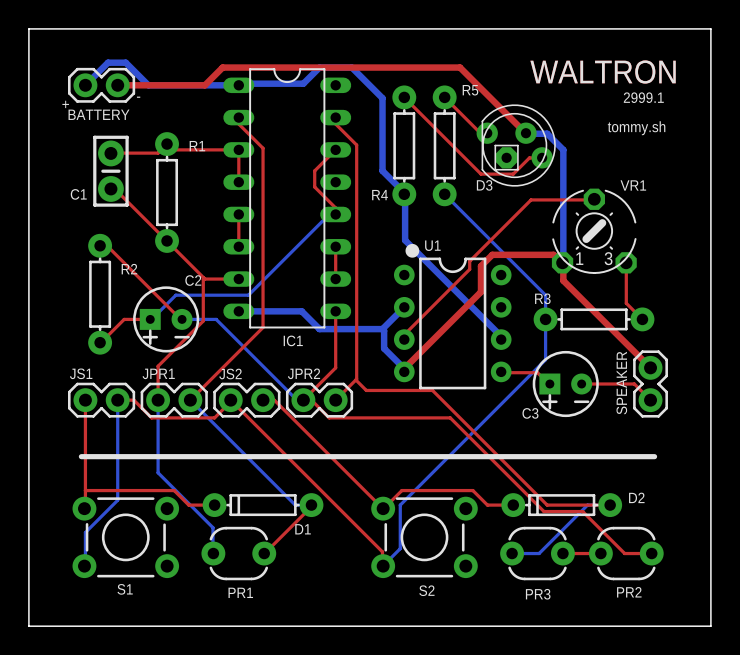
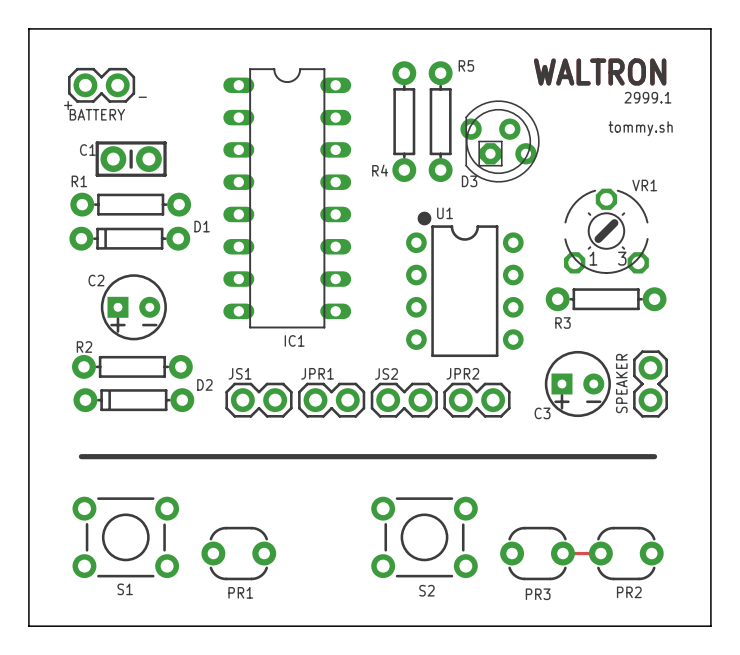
bottom track: (85, 85) (108, 62) (125, 62) (148, 85) (303, 83) (319, 67) (351, 67) (382, 98) (382, 170) (405, 195) (405, 240) (500, 335) (501, 339) -> none
top track: (117, 85) (204, 85) (222, 67) (460, 67) (525, 133) -> none
top track: (404, 97) (481, 174) (513, 174) (529, 157) (542, 157) -> none
top track: (444, 97) (479, 132) (487, 133) -> none
top track: (238, 117) (238, 124) (263, 148) (263, 327) (190, 400) -> none
top track: (335, 117) (335, 124) (356, 145) (356, 379) (335, 400) -> none
bottom track: (525, 133) (547, 133) (563, 149) (562, 262) -> none
R4 position: (404, 145) -> (404, 121)
R5 position: (444, 145) -> (440, 121)
D3 position: (516, 145) -> (500, 141)
R1 name position: R1 (197, 146) -> R1 (79, 181)
top track: (335, 149) (314, 170) (314, 187) (335, 208) (335, 214) -> none
top track: (110, 153) (158, 153) (167, 144) (172, 149) (238, 149) (238, 182) -> none
part rotation: 0° (110, 171) -> 90° clockwise (131, 159)
top track: (110, 188) (116, 190) (204, 279) (238, 279) -> none
R1 rotation: 0° (167, 192) -> 90° clockwise (130, 204)
text position: C1 (78, 194) -> C1 (87, 150)
bottom track: (444, 194) (545, 295) (545, 359) (400, 505) (400, 548) (383, 566) -> none
top track: (594, 199) (531, 199) (469, 261) (469, 269) (405, 333) (404, 339) -> none
top track: (238, 214) (238, 246) -> none
bottom track: (335, 214) (329, 214) (248, 295) (175, 295) (150, 319) -> none
VR1 position: (594, 231) -> (606, 231)
top track: (100, 245) (108, 246) (182, 319) -> none
top track: (335, 246) (335, 279) -> none
top track: (626, 262) (626, 303) (642, 319) -> none
R2 name position: R2 (129, 269) -> R2 (84, 347)
top track: (204, 278) (203, 321) (158, 366) (158, 400) -> none
C2 name position: C2 (193, 280) -> C2 (96, 280)
C2 footprint: [133, 286, 200, 353] -> [100, 274, 167, 341]
R2 rotation: 0° (100, 294) -> 90° clockwise (132, 366)
R2 position: (100, 294) -> (132, 366)
R3 name position: R3 (542, 298) -> R3 (562, 323)
bottom track: (404, 307) (382, 329) -> none
bottom track: (238, 311) (301, 311) (319, 329) (382, 329) -> none
top track: (335, 311) (335, 367) (303, 400) (308, 396) (329, 417) (450, 417) (543, 511) (582, 511) (624, 553) (651, 553) -> none
U1 position: (452, 316) -> (464, 284)
top track: (150, 319) (124, 319) (100, 342) -> none
bottom track: (182, 319) (216, 319) (296, 400) (303, 400) -> none
R3 position: (594, 319) -> (606, 299)
bottom track: (382, 329) (384, 348) (403, 367) (404, 371) -> none
top track: (650, 367) (563, 280) (563, 262) (553, 254) (492, 254) (481, 266) (481, 291) (405, 367) (404, 371) -> none
top track: (501, 371) (537, 372) (549, 384) -> none
top track: (355, 379) (366, 390) (432, 390) (547, 505) (610, 505) -> none
C3 position: (565, 384) -> (577, 384)
top track: (581, 384) (634, 384) (650, 400) -> none
top track: (85, 400) (84, 508) -> none
JS1 position: (101, 400) -> (259, 400)
top track: (117, 400) (133, 400) (151, 417) (214, 417) (230, 400) (382, 551) (383, 566) -> none
bottom track: (117, 400) (117, 500) (85, 532) (84, 566) -> none
bottom track: (158, 400) (158, 472) (212, 527) (213, 553) -> none
JPR1 position: (174, 400) -> (331, 400)
bottom track: (190, 400) (295, 505) (311, 505) -> none
JS2 position: (246, 400) -> (404, 400)
top track: (263, 400) (274, 400) (383, 508) (401, 490) (472, 490) (487, 505) (513, 505) -> none
JPR2 position: (319, 400) -> (476, 400)
top track: (85, 490) (174, 490) (188, 505) (214, 505) -> none
D2 name position: D2 (636, 497) -> D2 (204, 384)
D1 position: (263, 505) -> (129, 238)
top track: (311, 505) (264, 553) -> none
D2 position: (561, 505) -> (133, 400)
bottom track: (610, 505) (587, 505) (539, 553) (512, 553) -> none
D1 name position: D1 (303, 529) -> D1 (202, 226)

